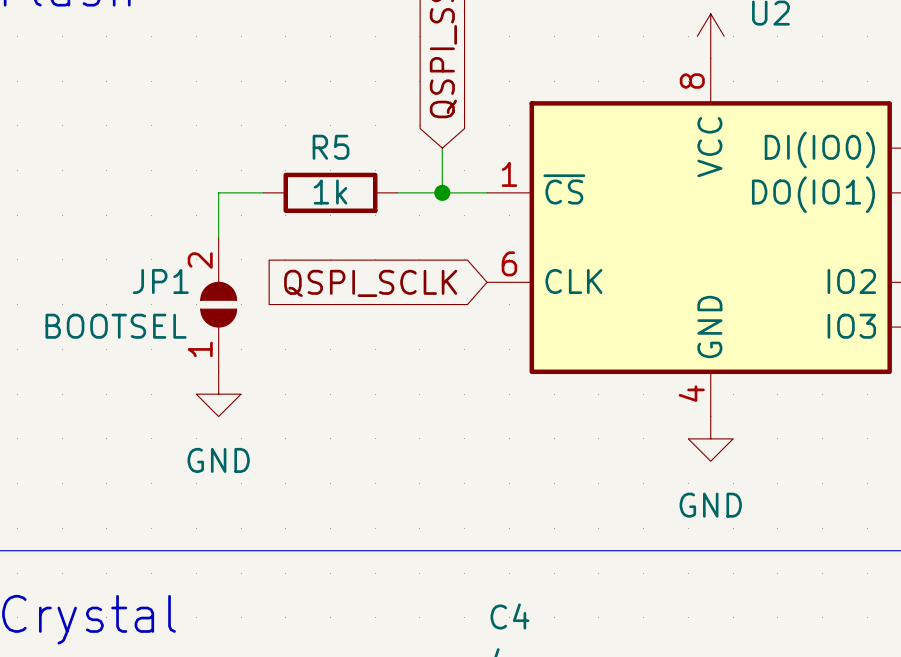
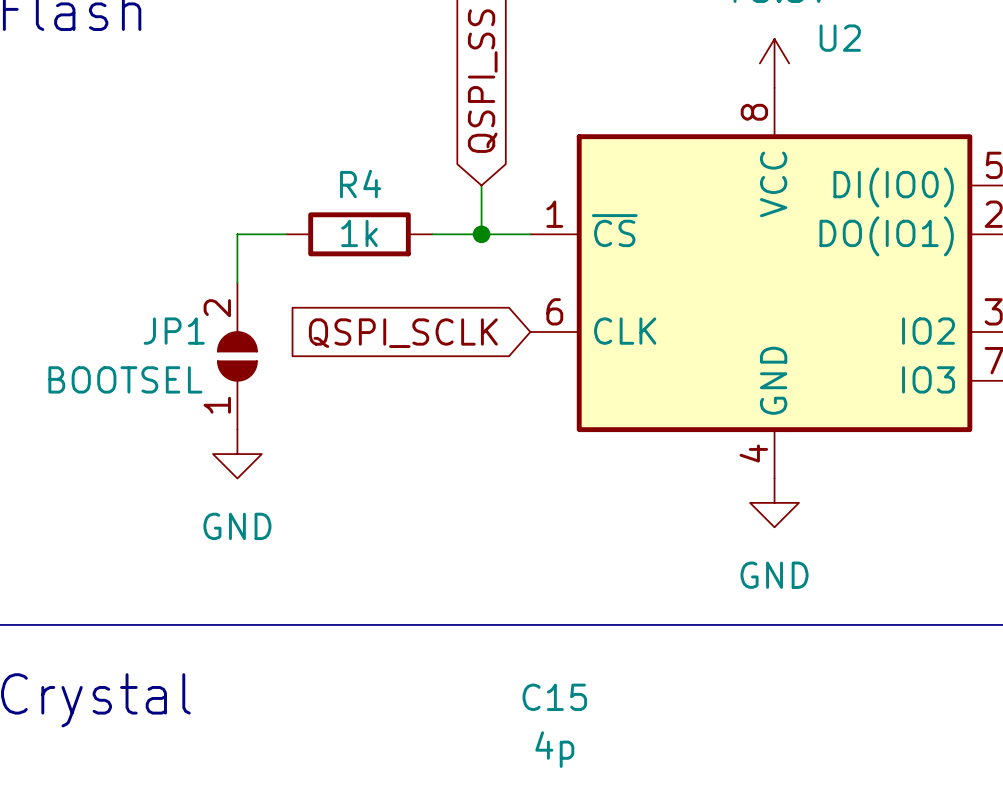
R5 name: R5 (331, 147) -> R4 (360, 184)
C4 name: C4 (509, 616) -> C15 (554, 697)

